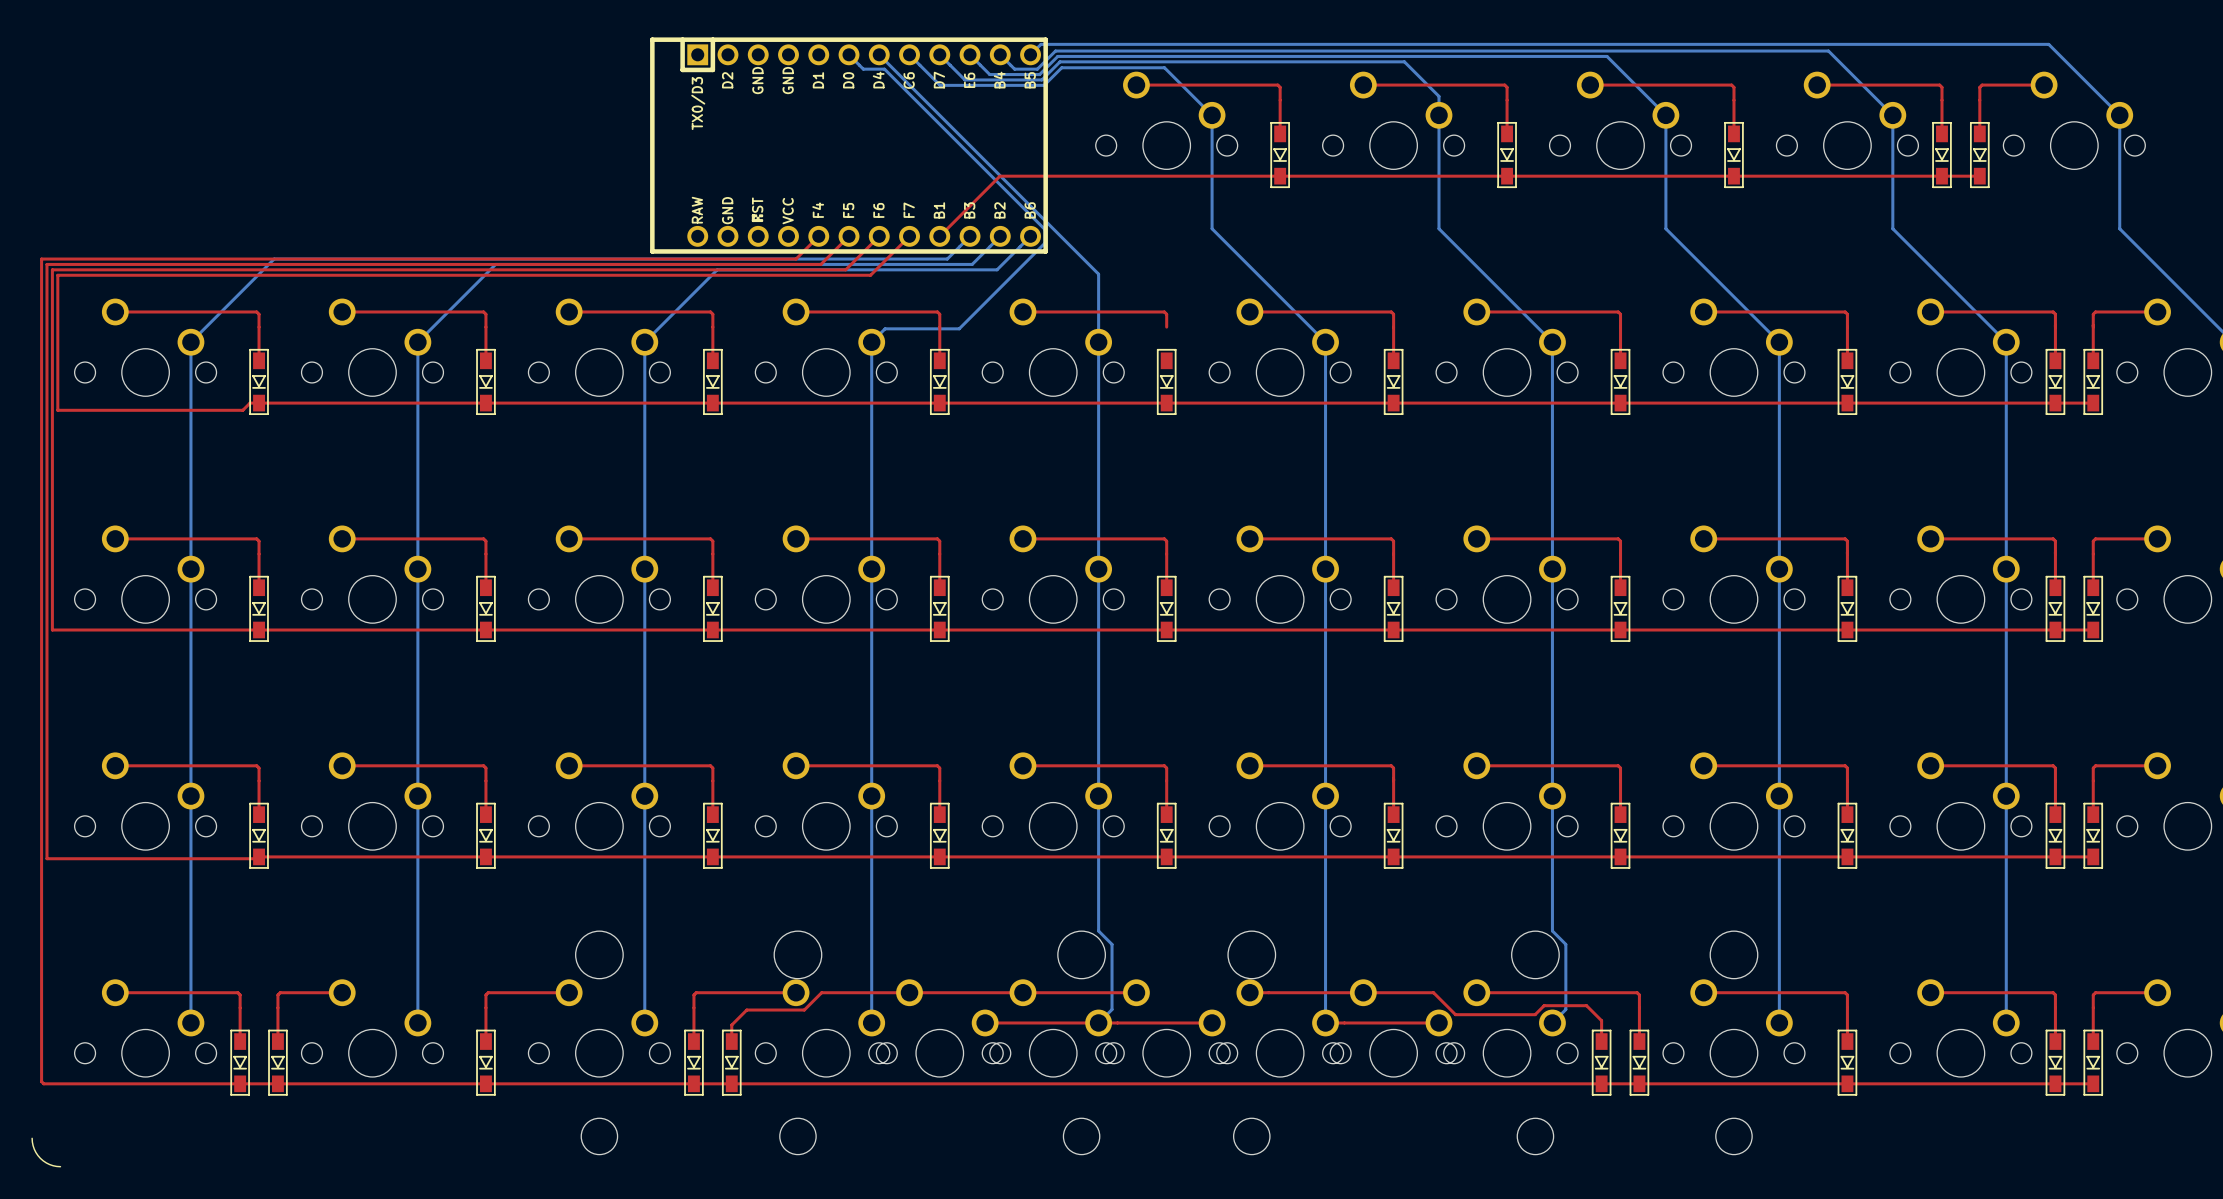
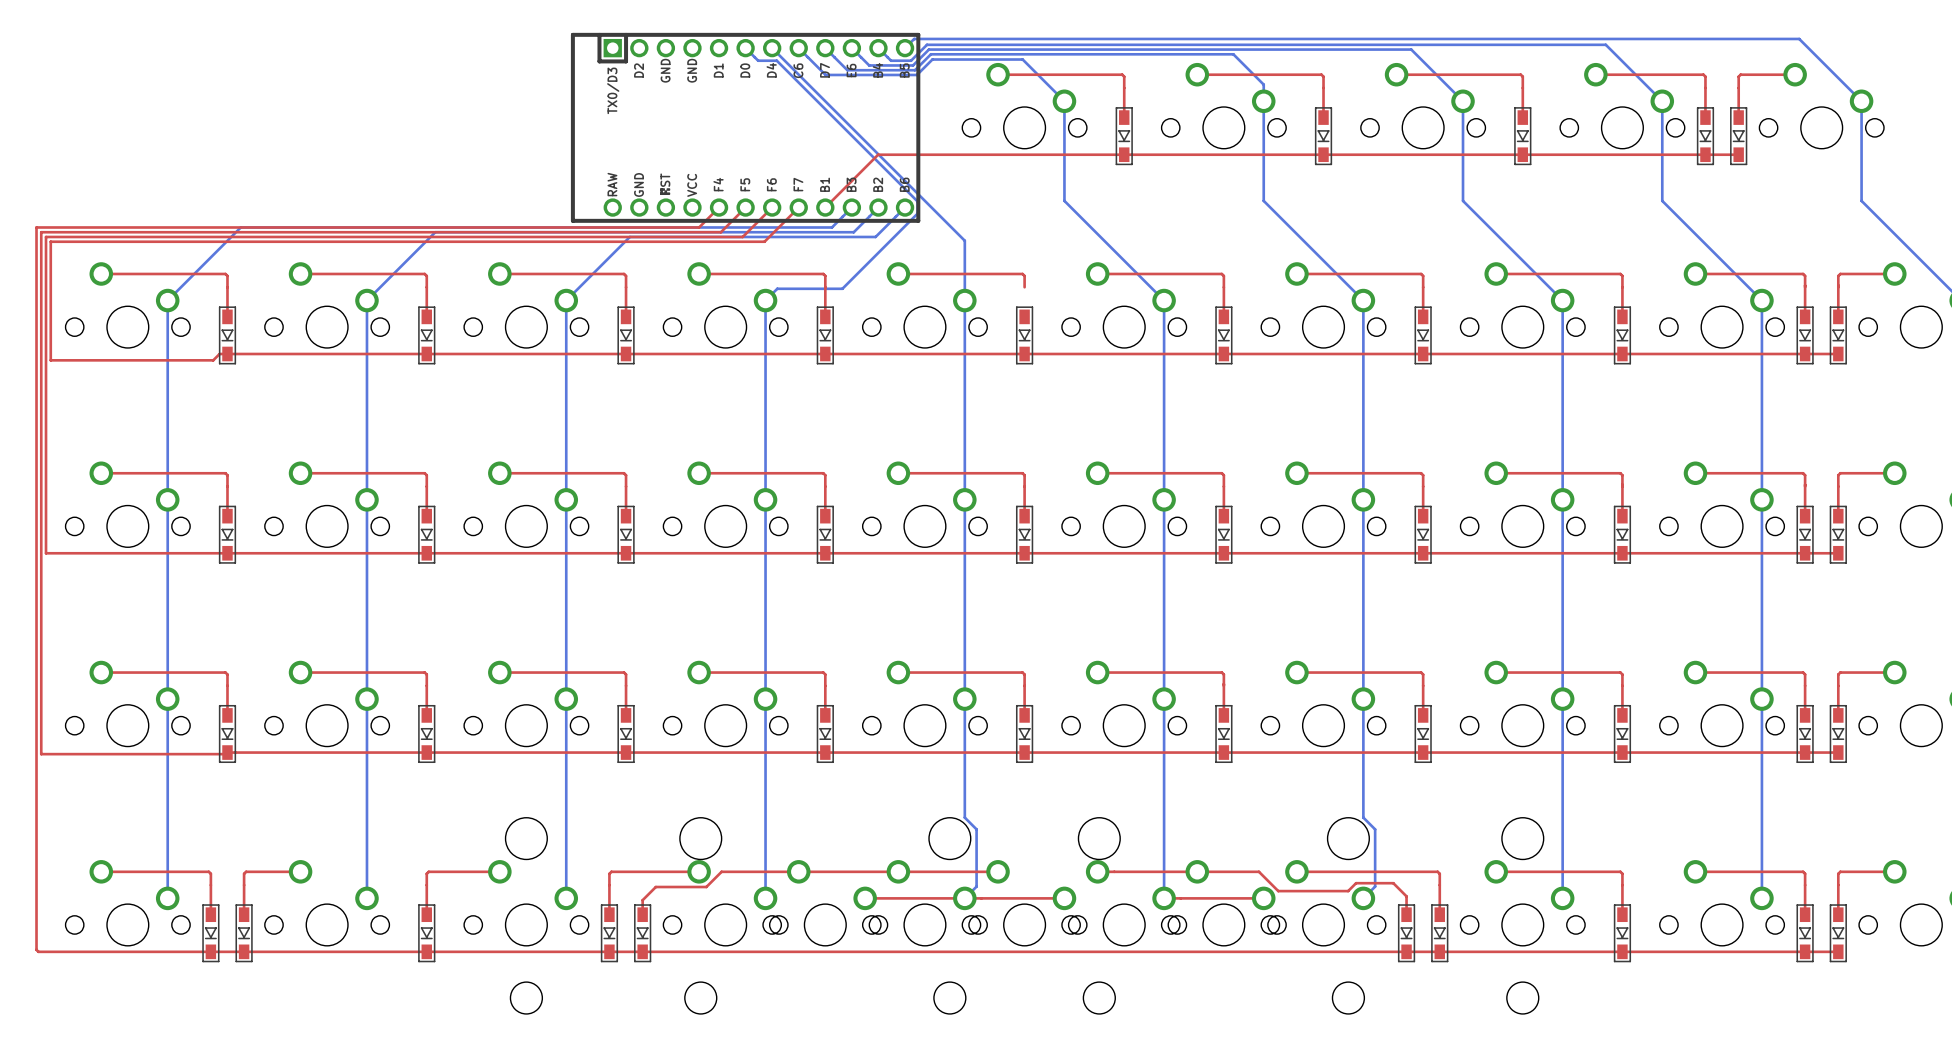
line: (32, 1138) (34, 1149) (40, 1158) (49, 1164) (60, 1166) -> none

